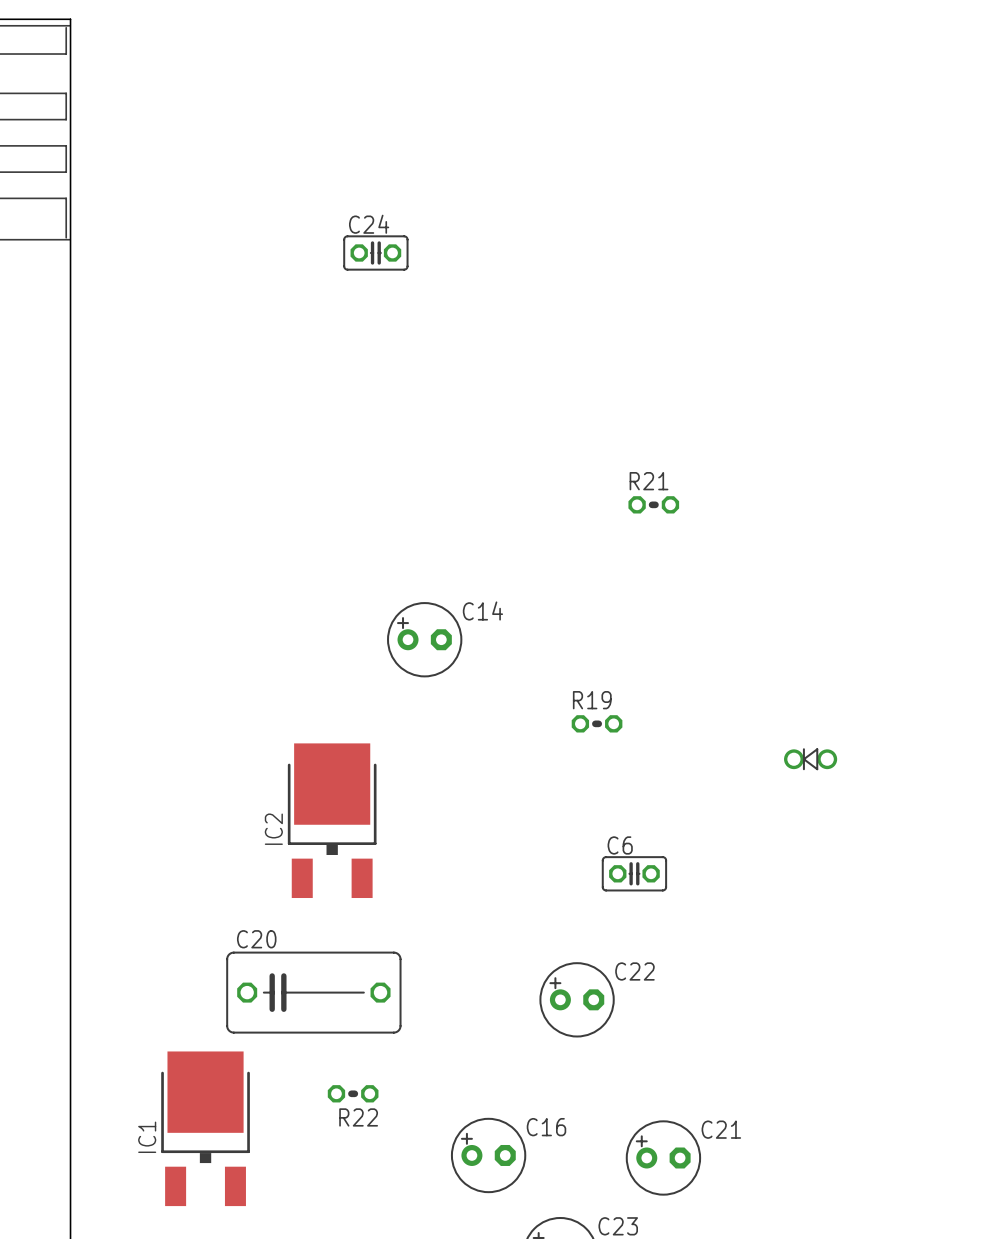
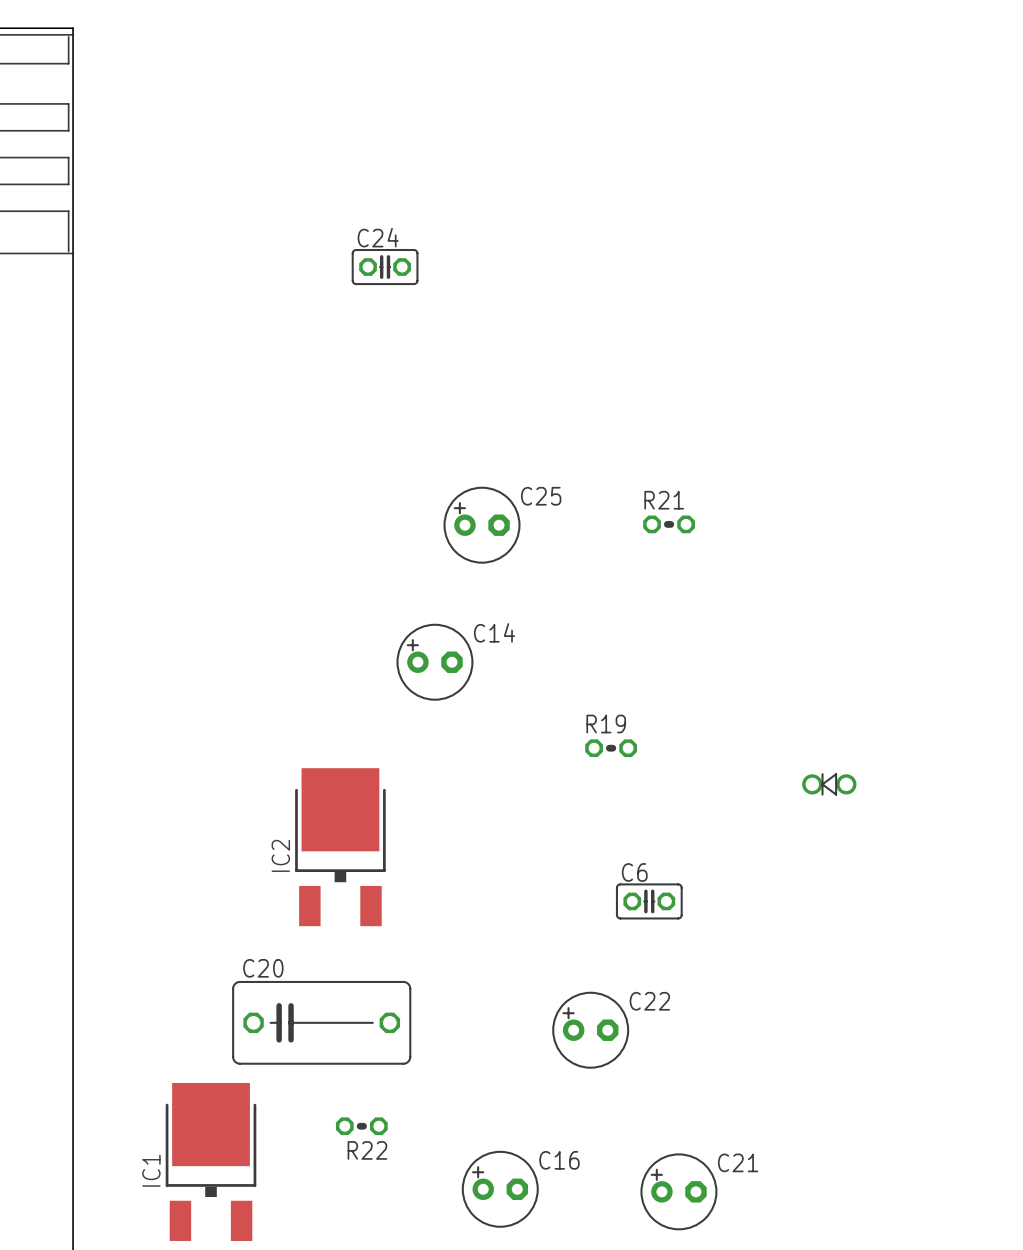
C25: none -> (482, 525)

